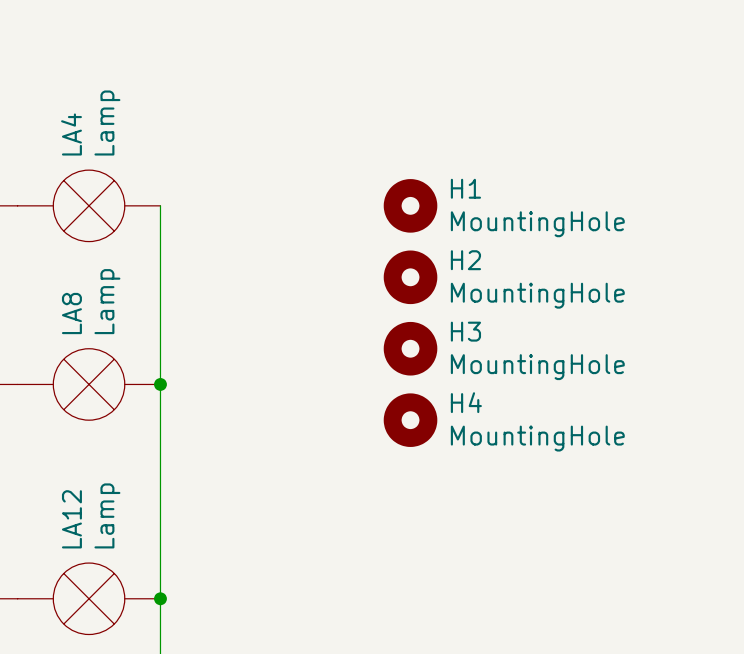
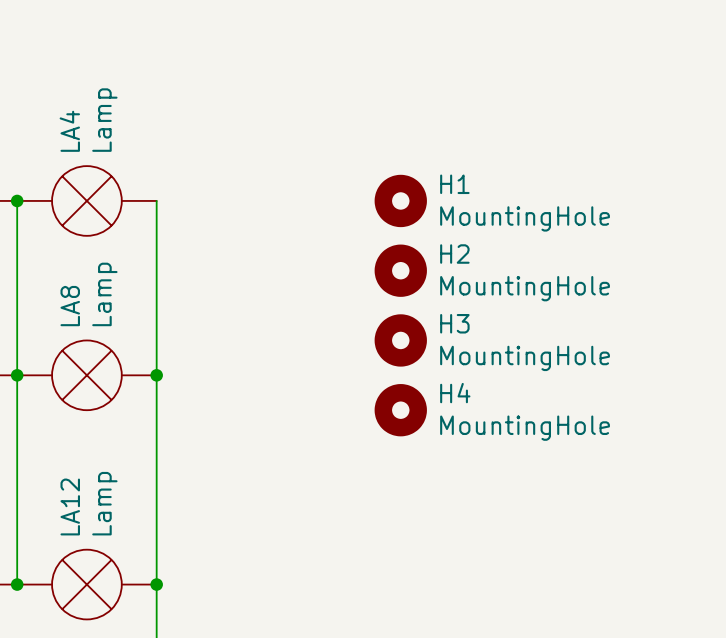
wire: none -> (17, 200) (17, 584)
junction: none -> (17, 200)
junction: none -> (17, 375)
junction: none -> (17, 584)

